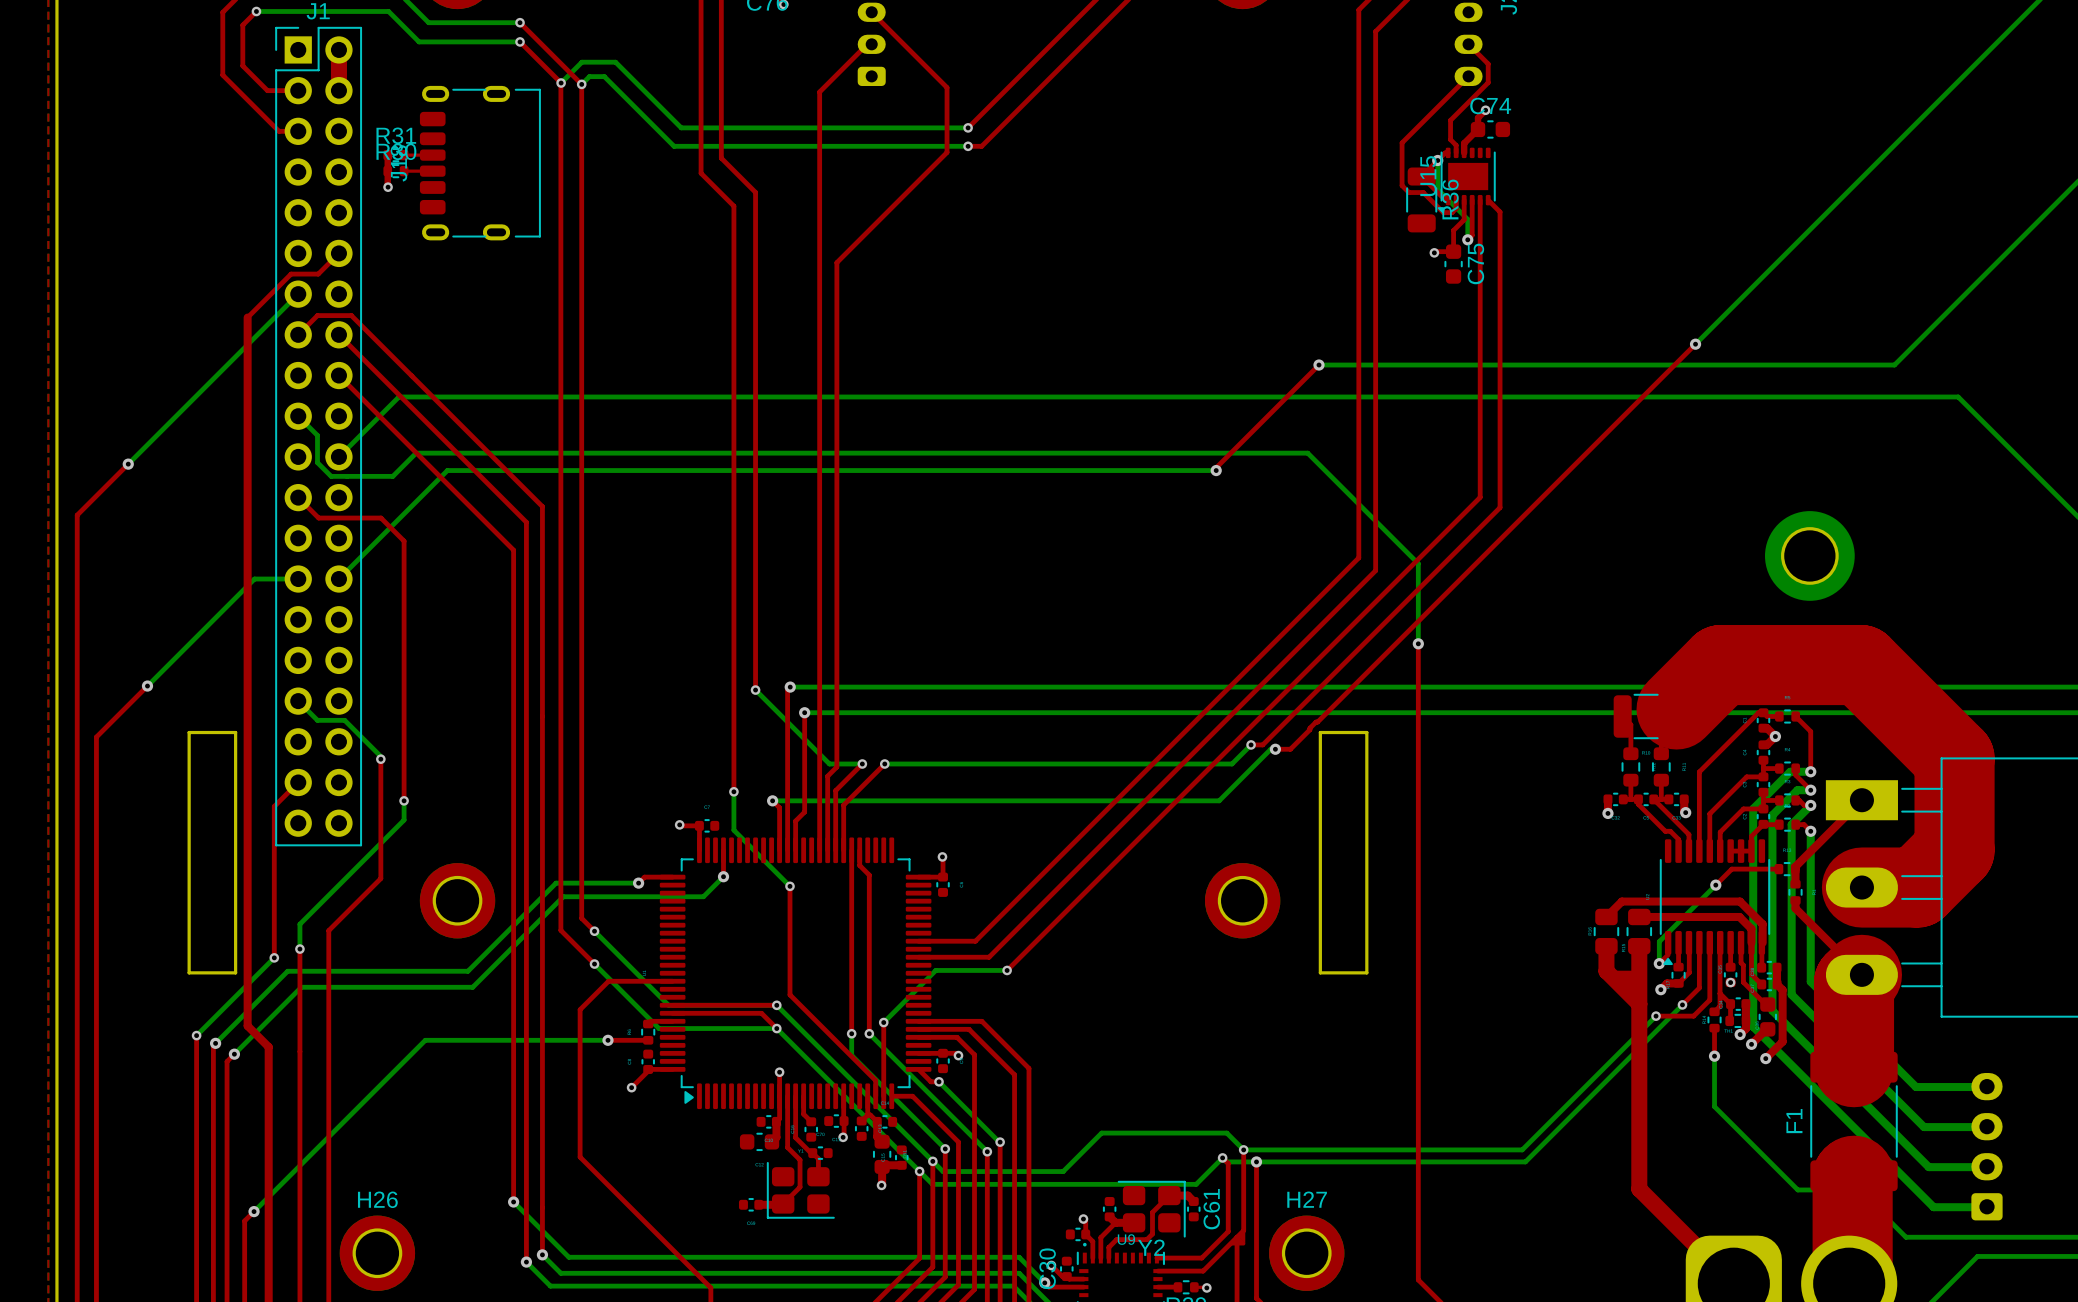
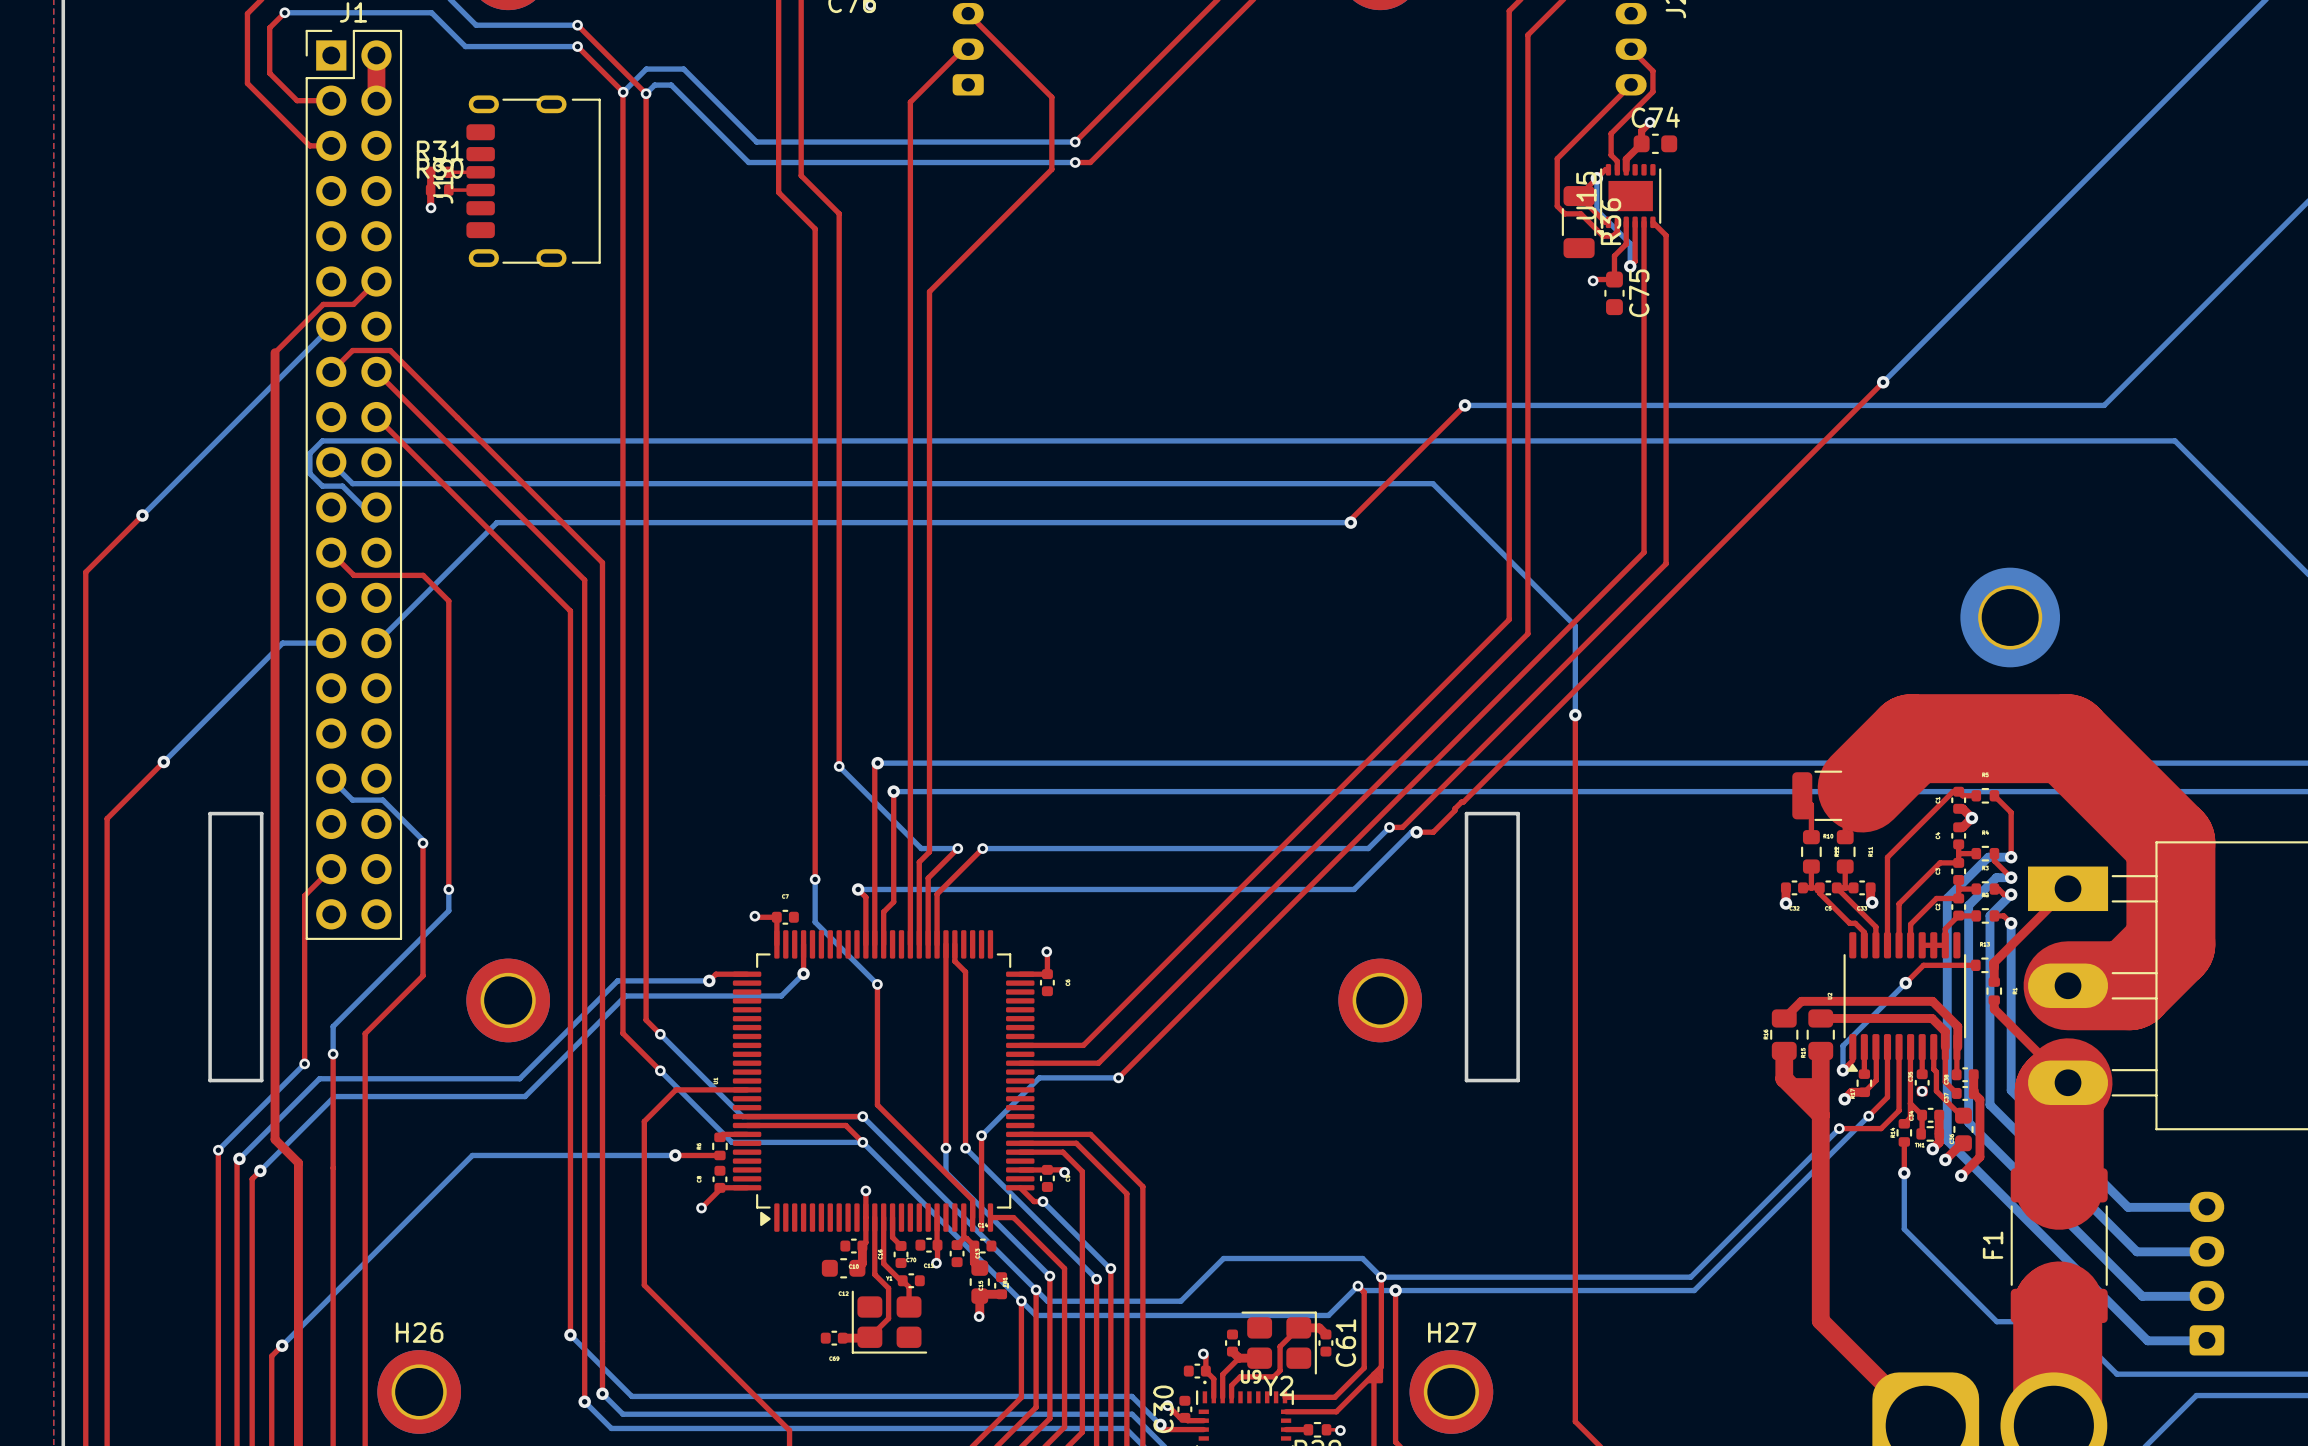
bottom track: (398, 396) (338, 456) -> (443, 440) (322, 440) (309, 453) (309, 473) (322, 486) (342, 486) (363, 507)
bottom track: (317, 435) (317, 462) (331, 476) (392, 476) (416, 453) (1307, 453) -> (352, 483) (1432, 483) (1452, 503)

